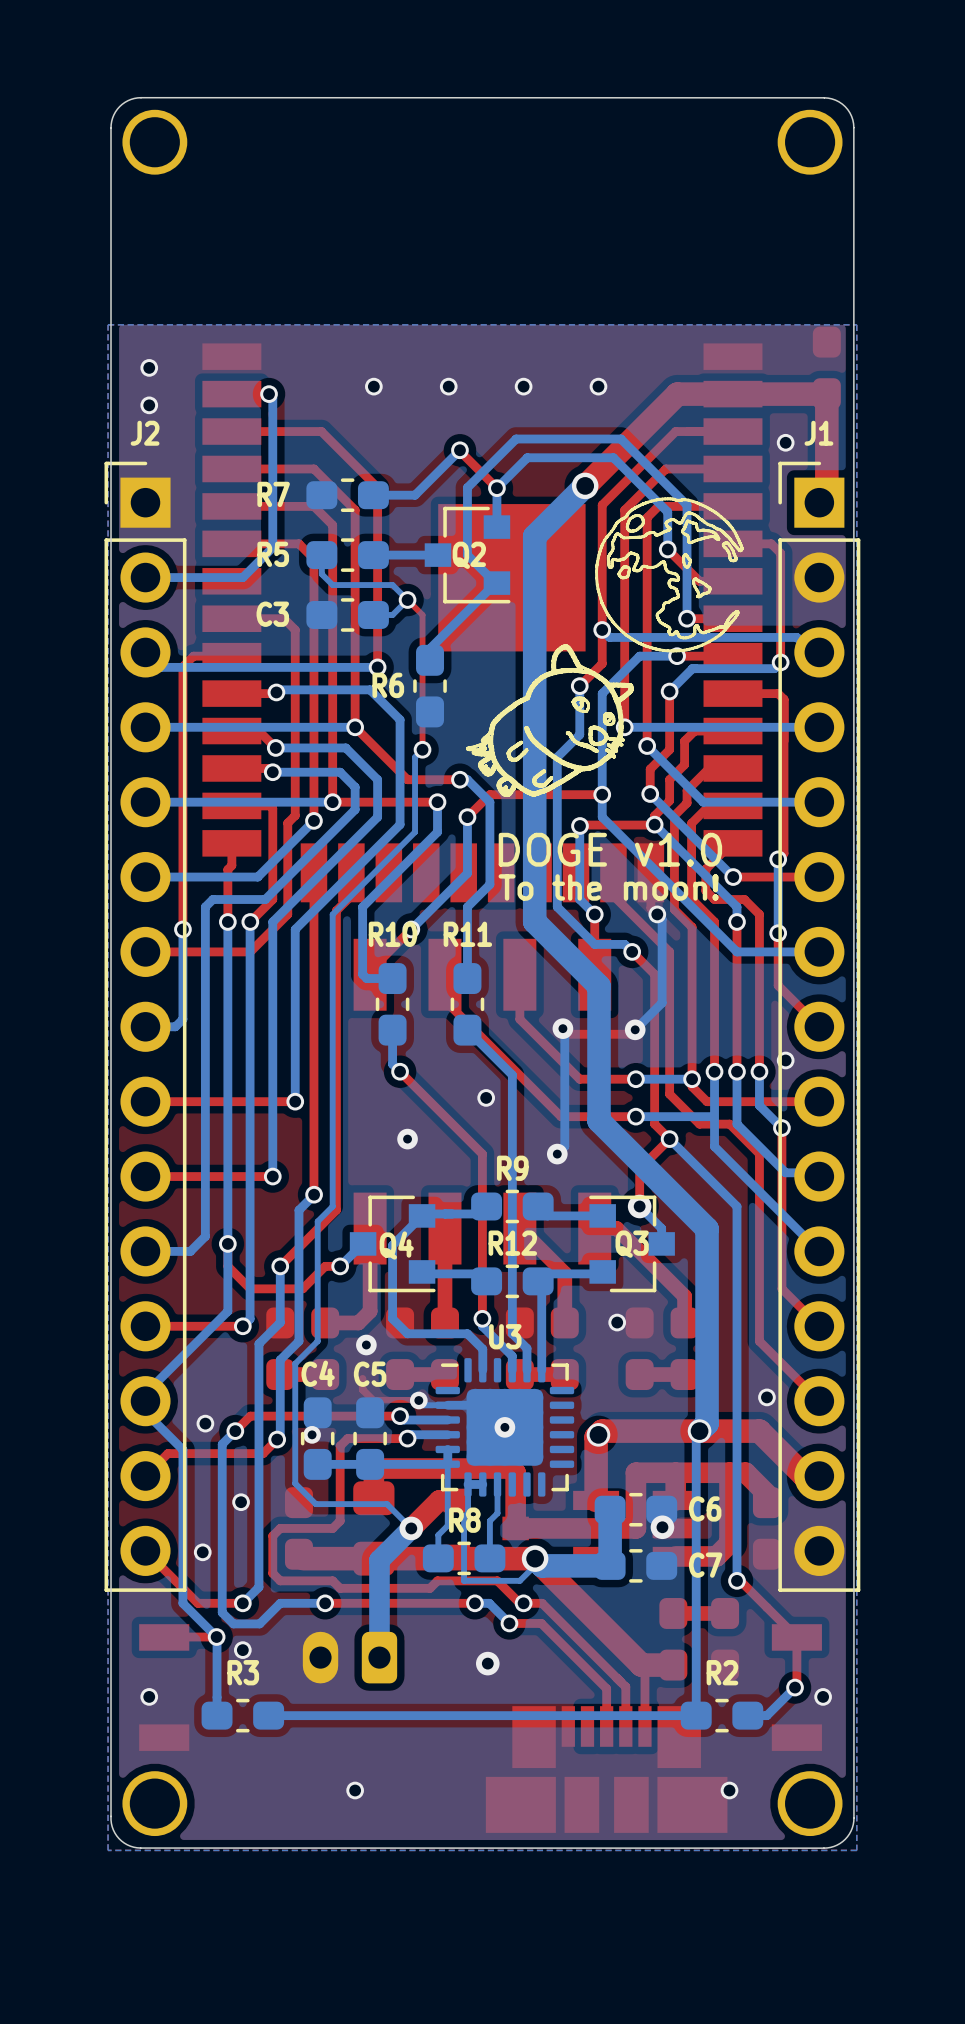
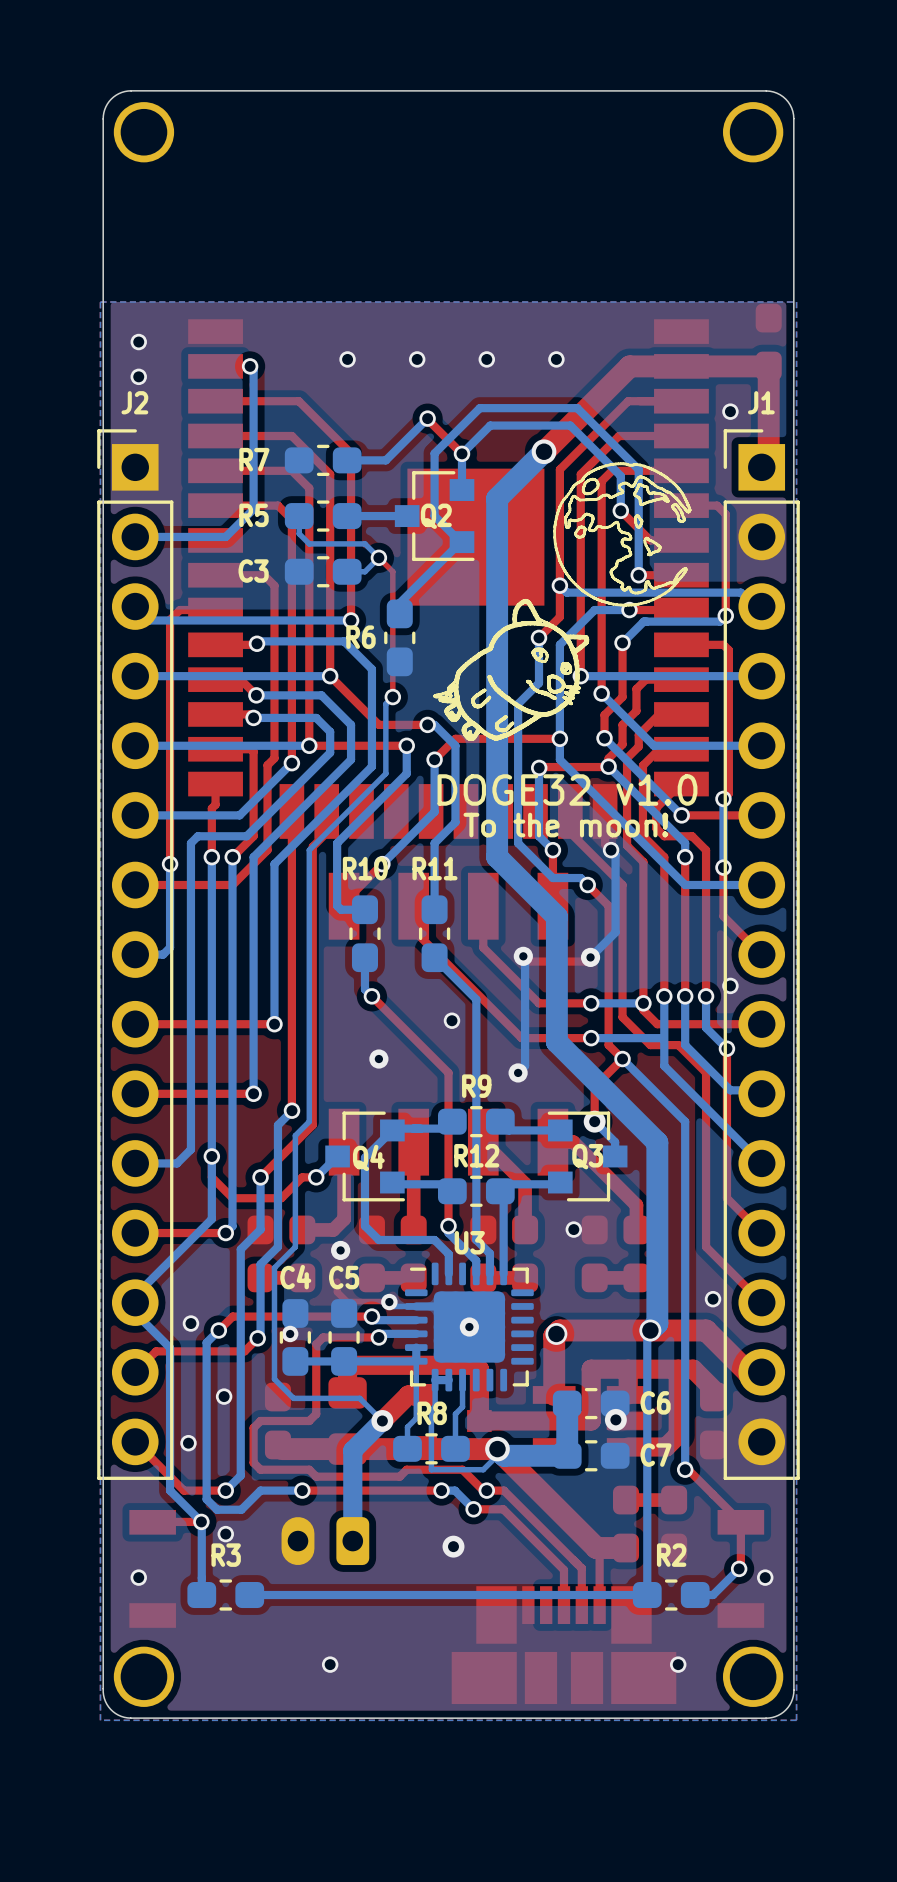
text: DOGE v1.0 (610, 849) -> DOGE32 v1.0 (567, 789)

